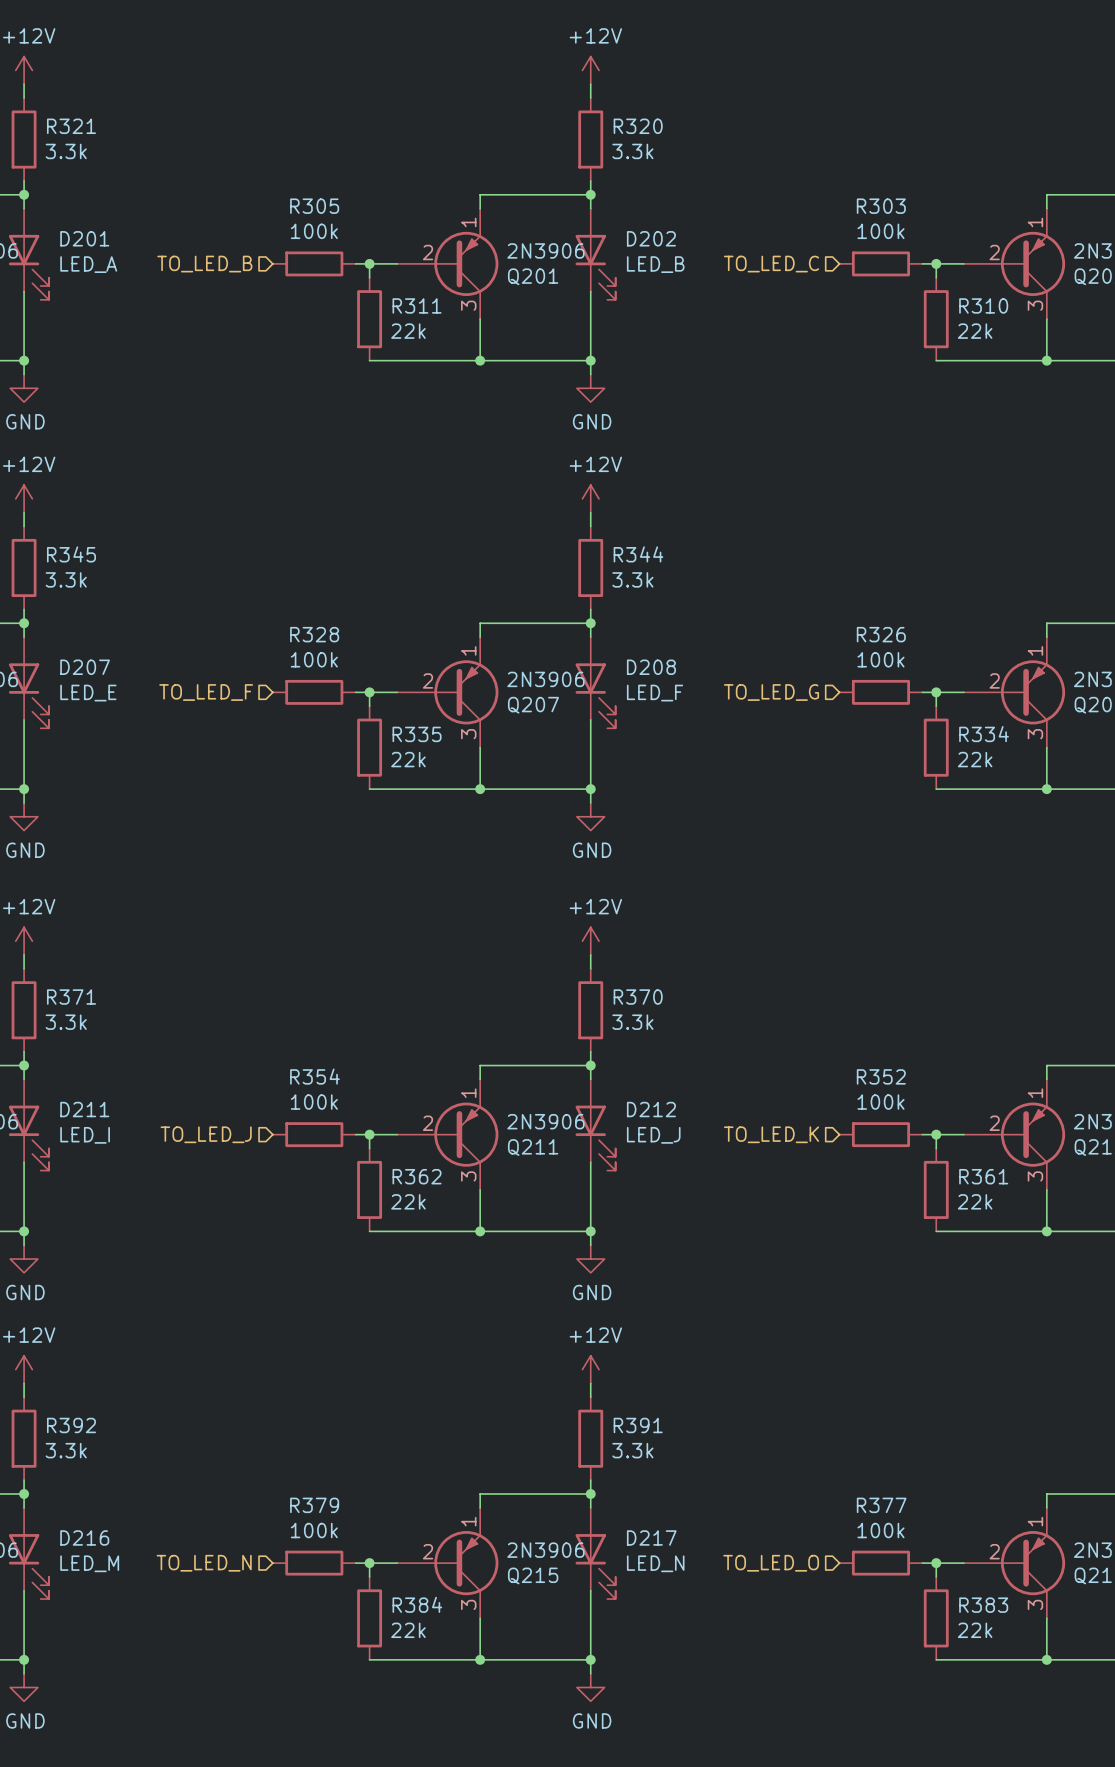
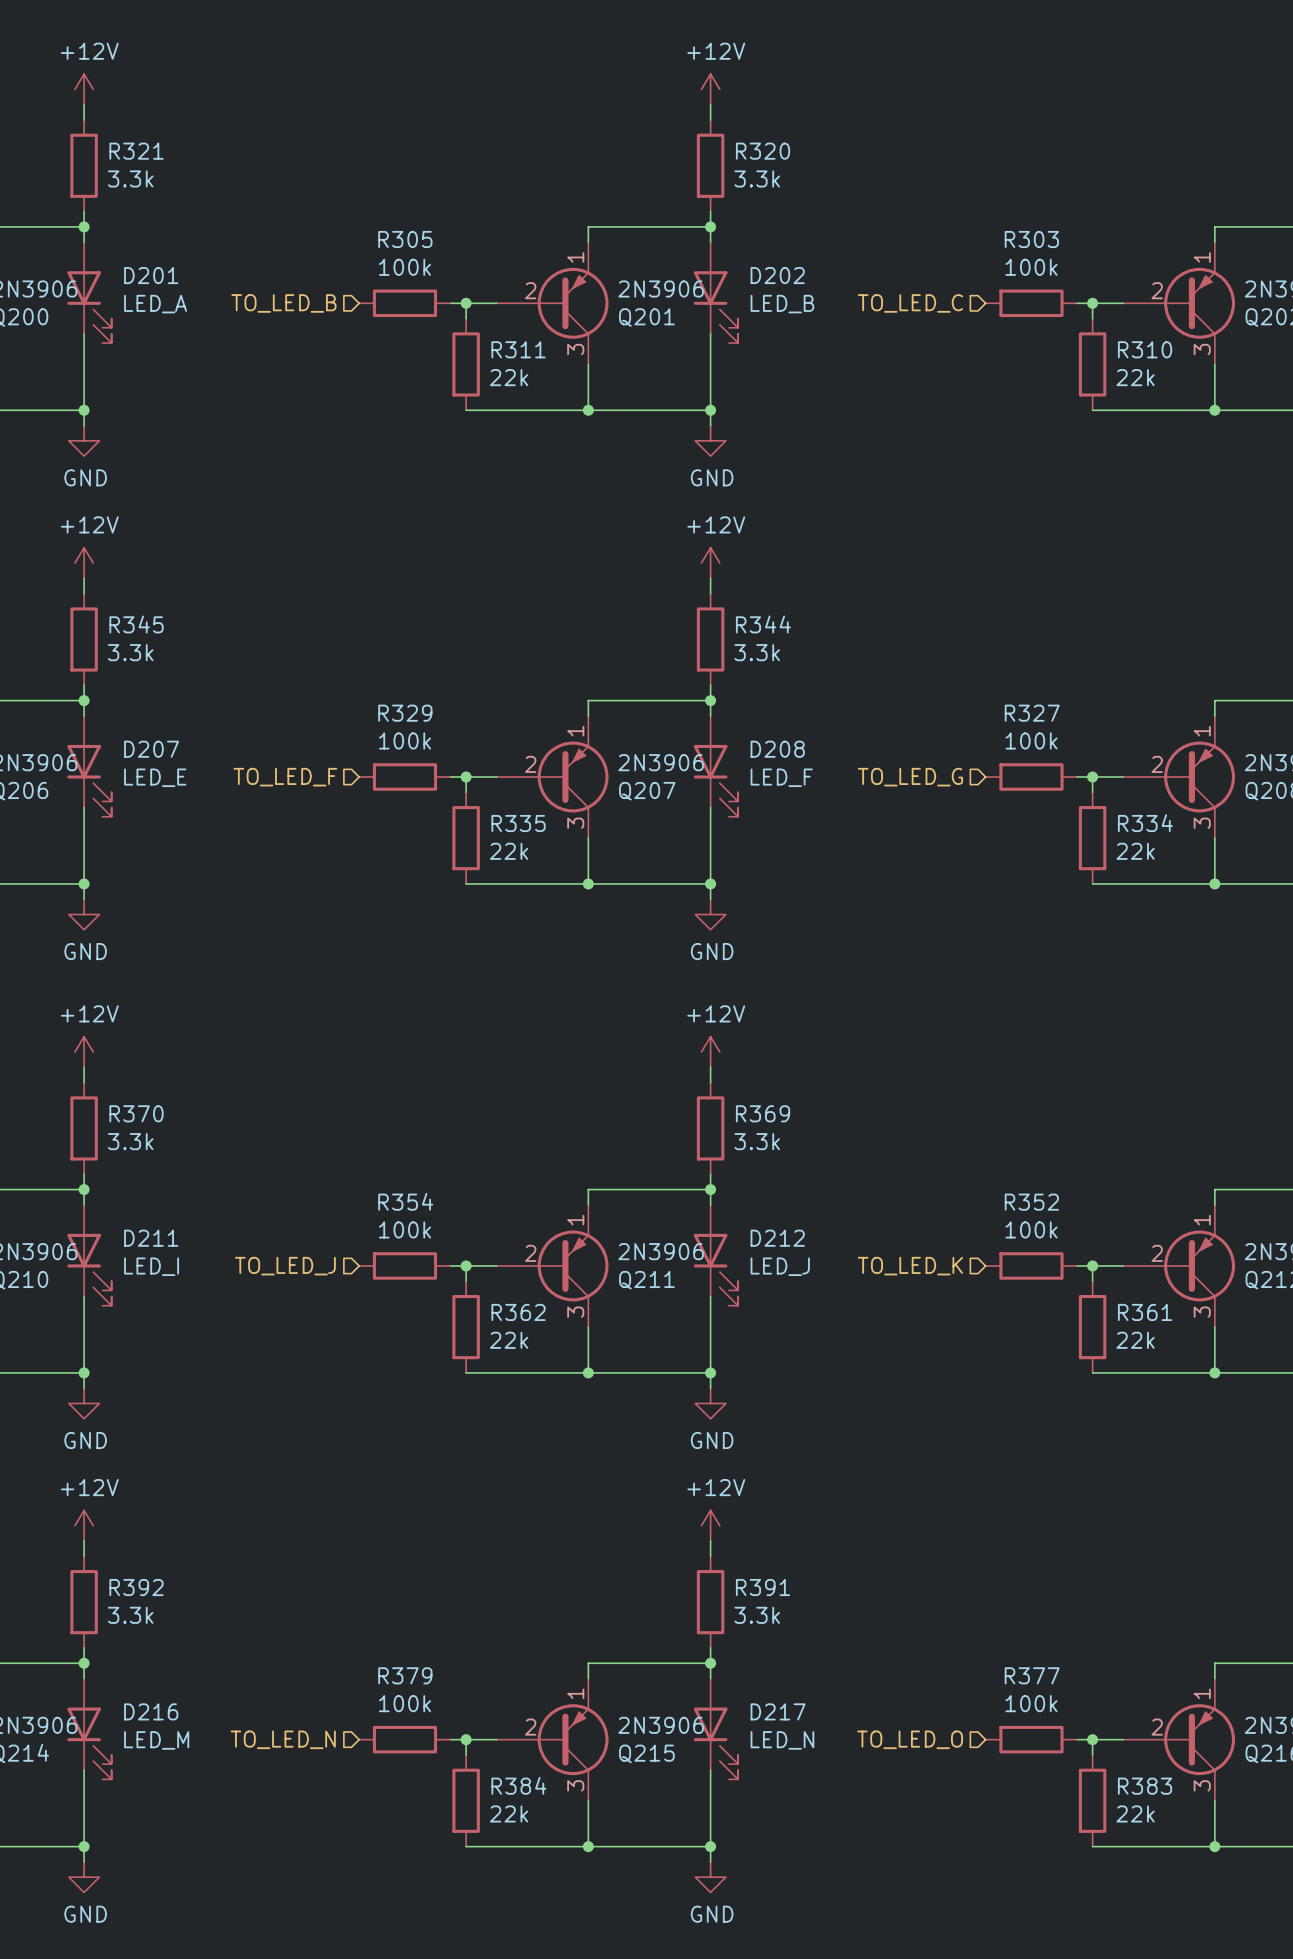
R328 name: R328 (314, 634) -> R329 (405, 713)
R326 name: R326 (881, 634) -> R327 (1032, 713)
R371 name: R371 (71, 997) -> R370 (136, 1113)
R370 name: R370 (638, 997) -> R369 (763, 1113)

